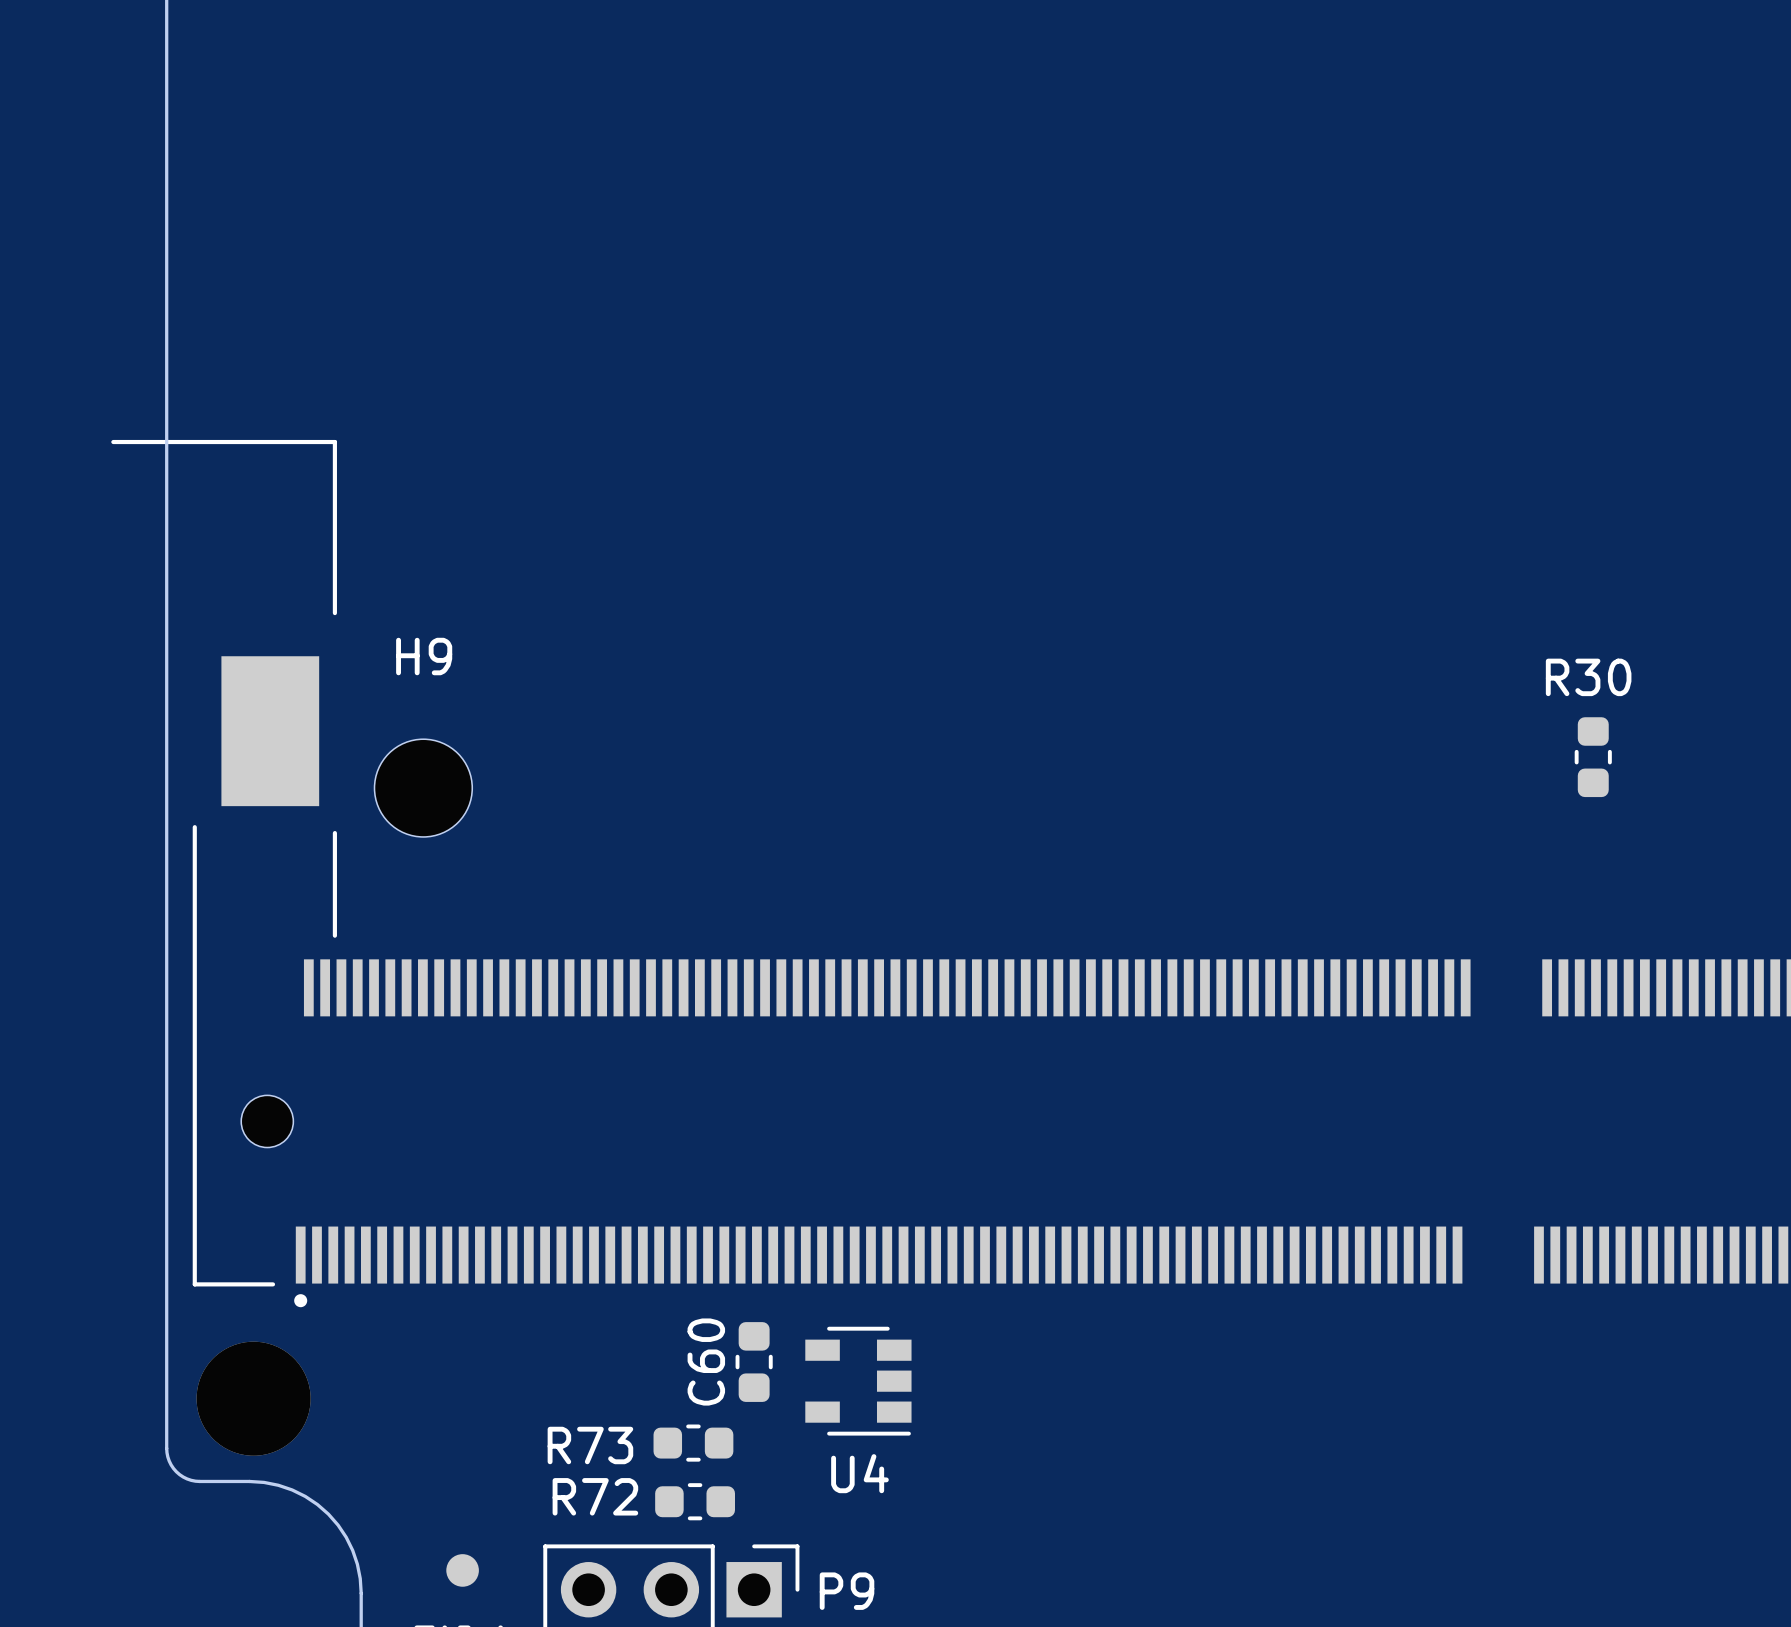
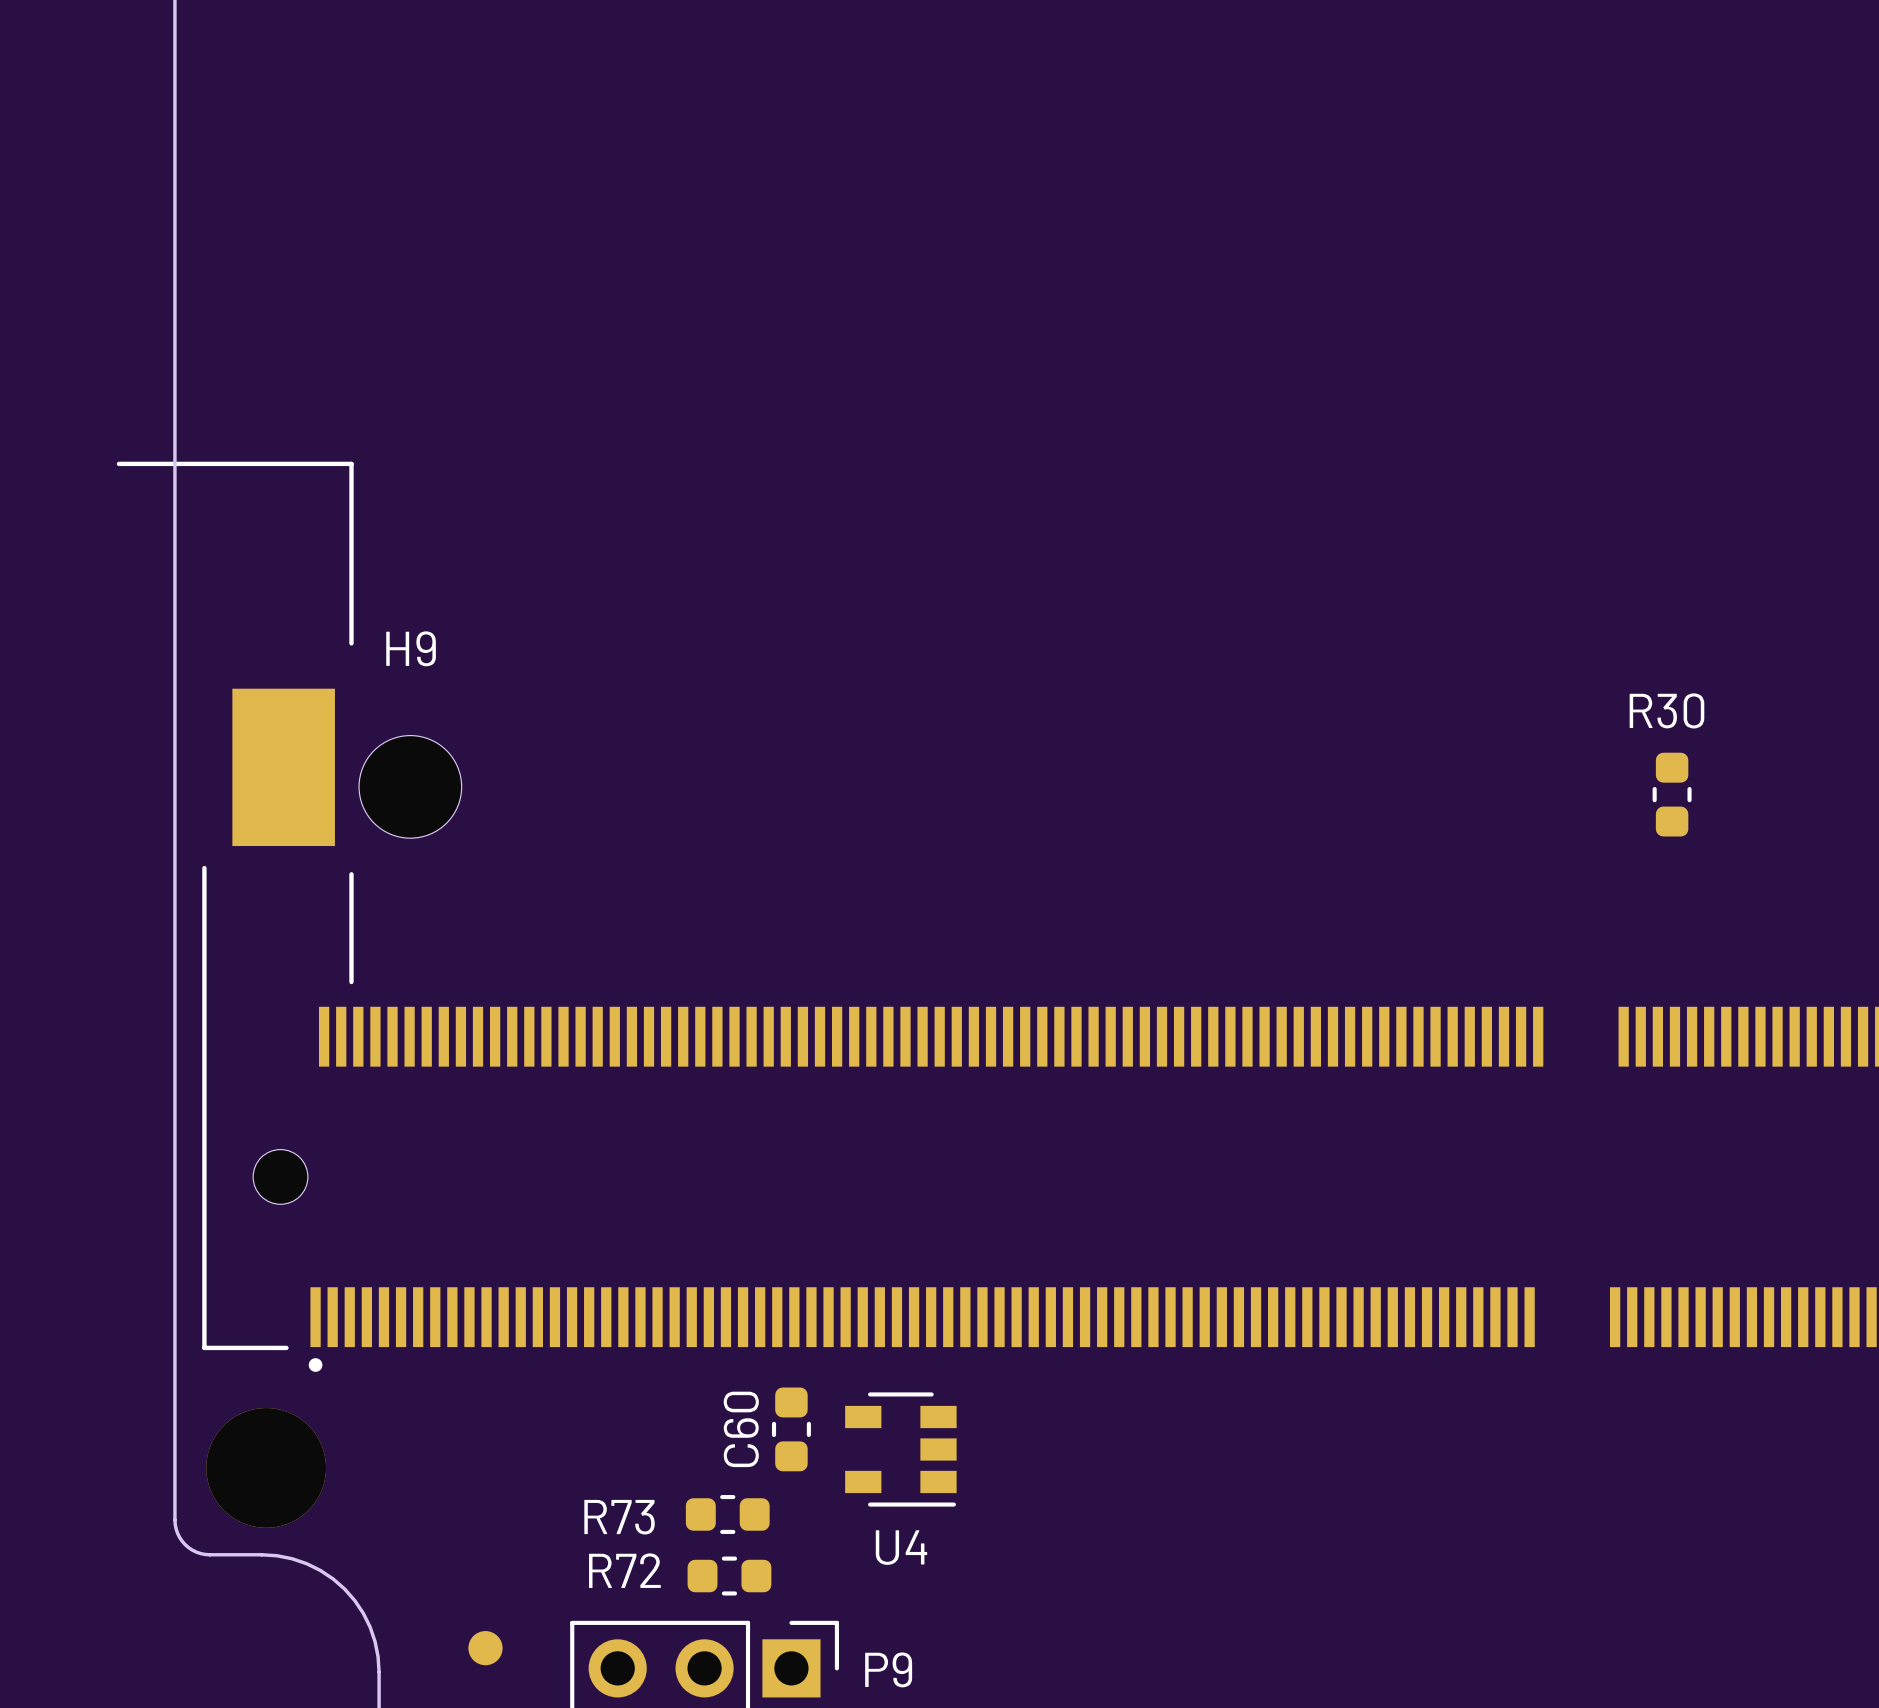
H9 position: (423, 788) -> (410, 786)

